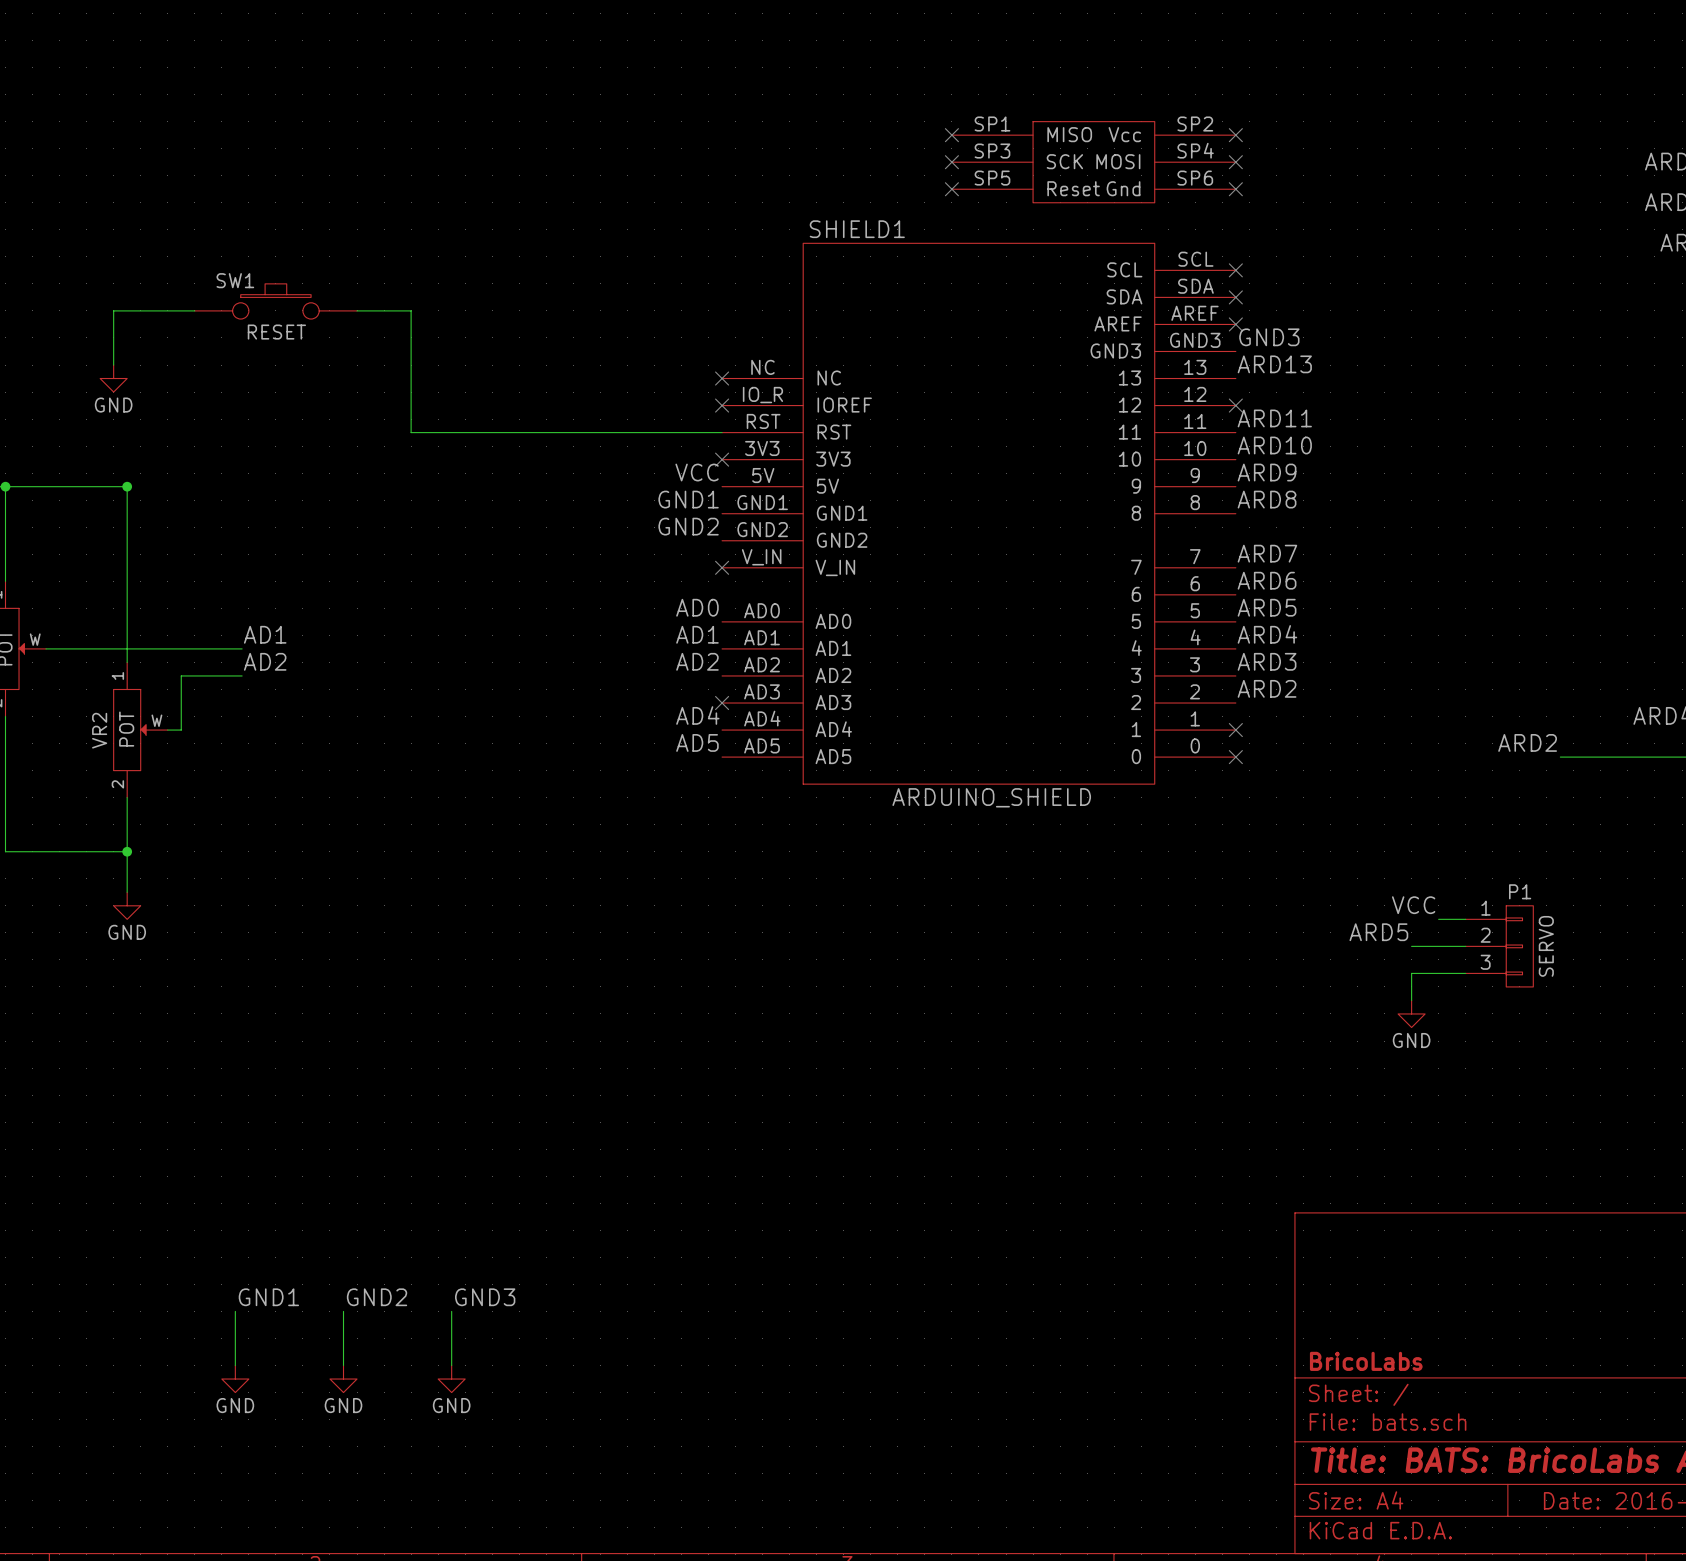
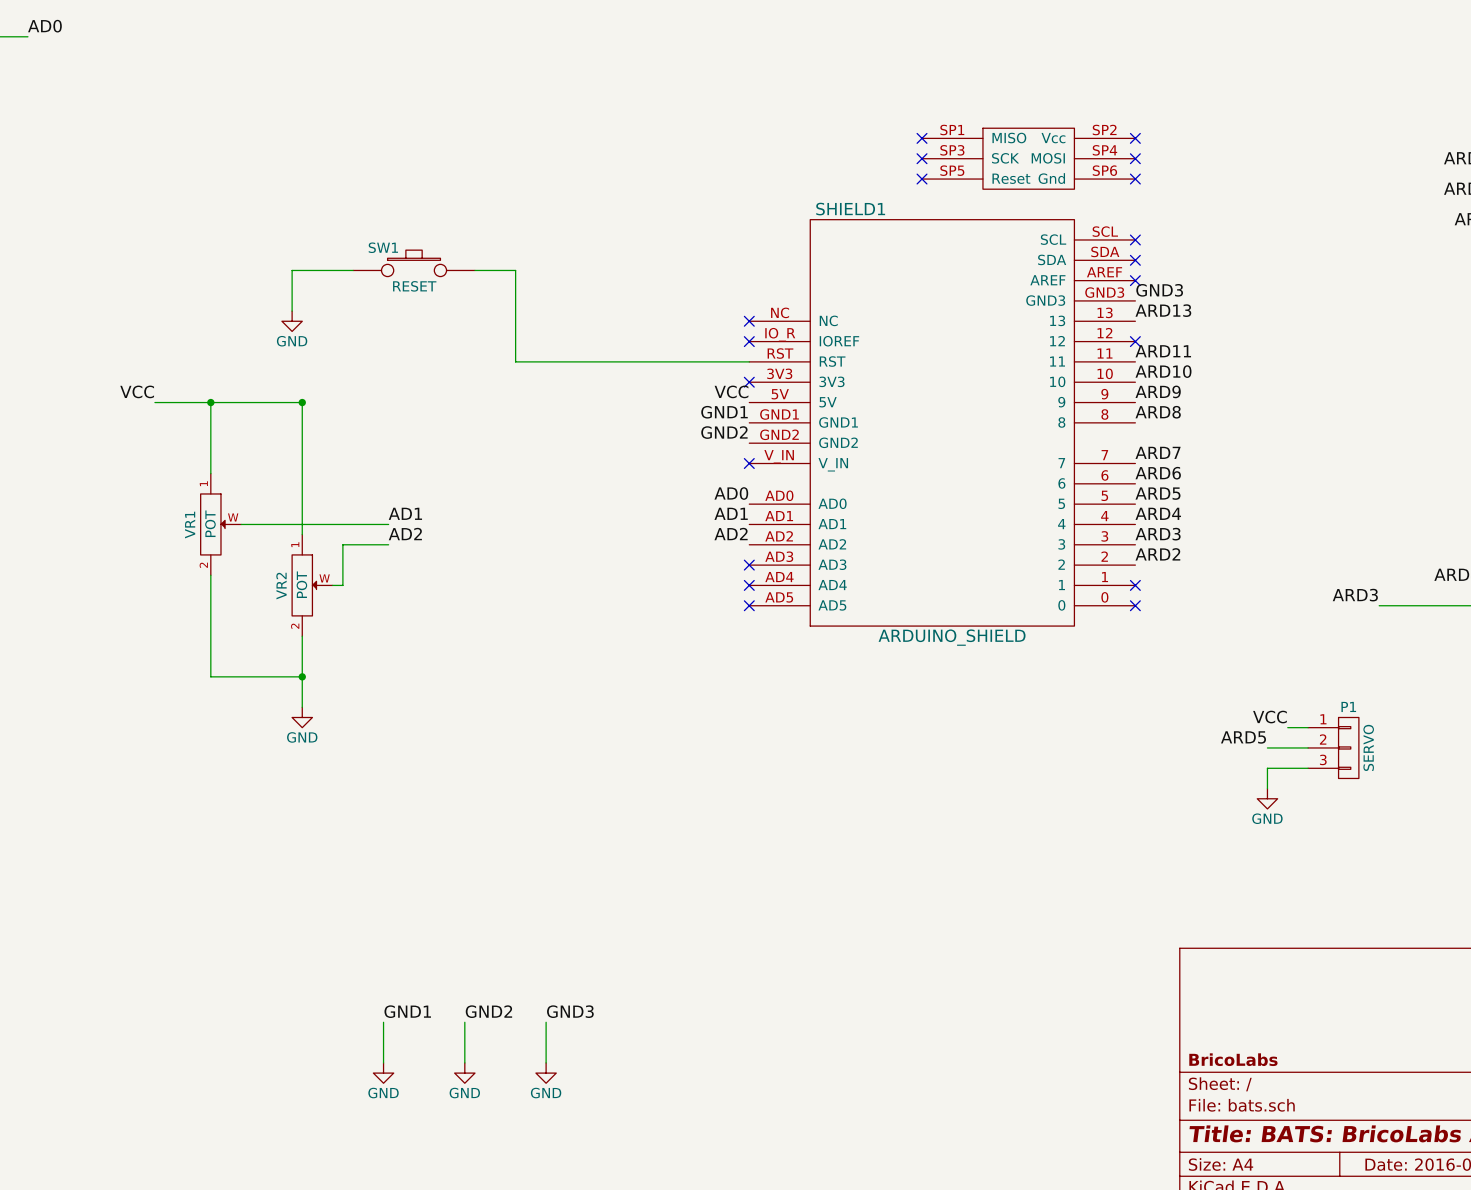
label: AD4 (697, 715) -> none
no-connect mark: none -> (749, 585)
label: AD5 (697, 742) -> none
label: ARD2 (1527, 742) -> ARD3 (1355, 595)
no-connect mark: none -> (749, 605)

